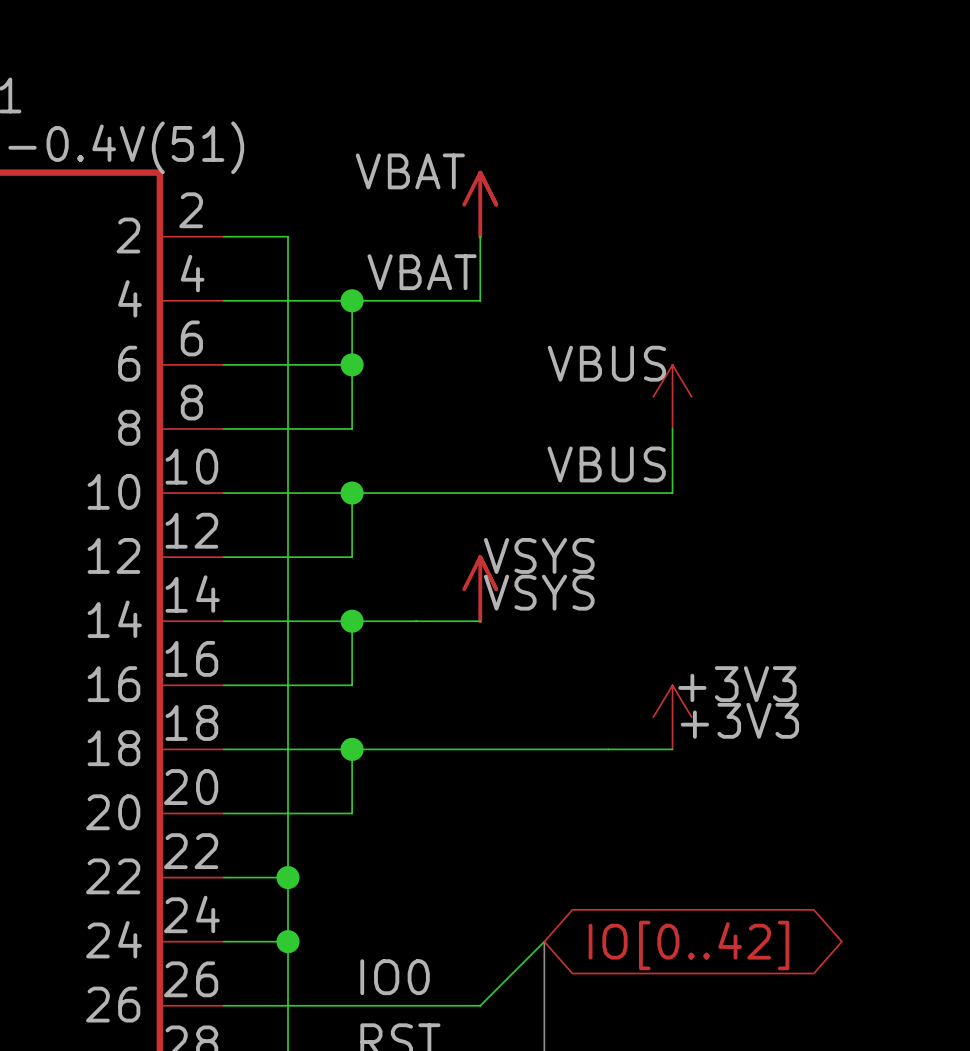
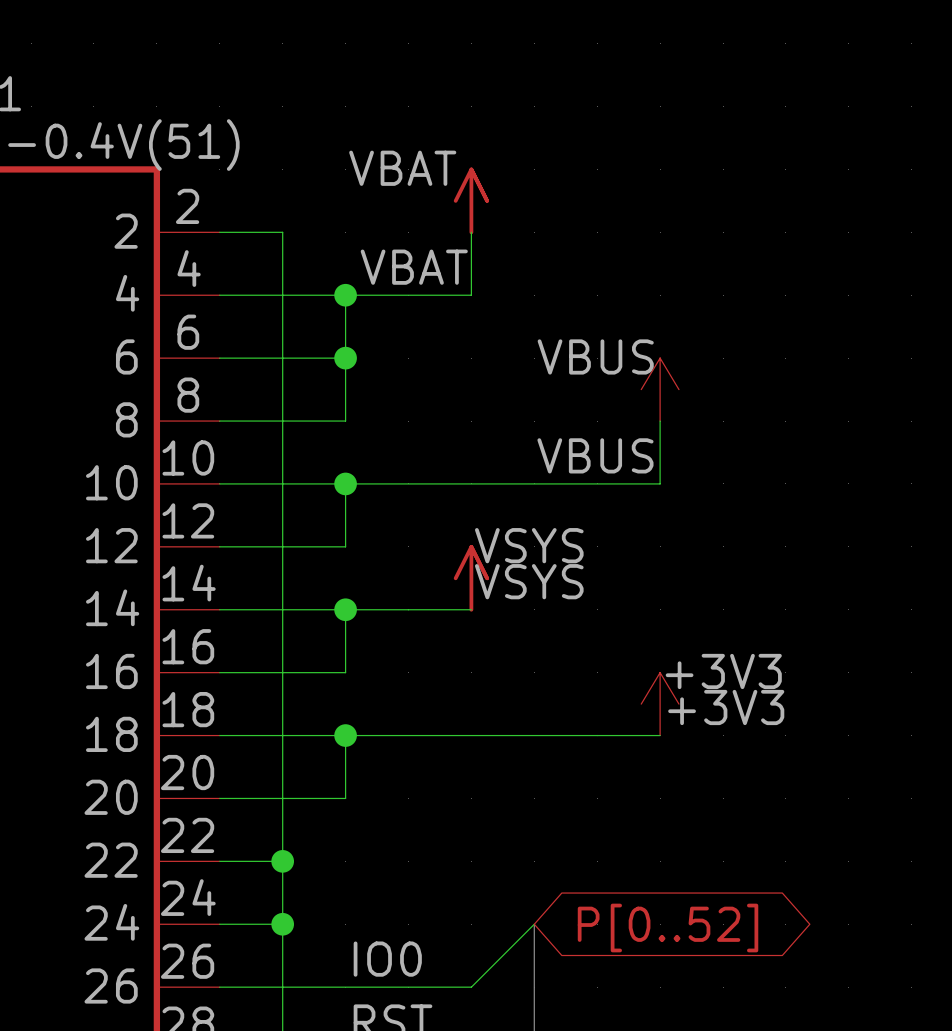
global label: IO[0..42] (688, 945) -> P[0..52] (668, 928)

